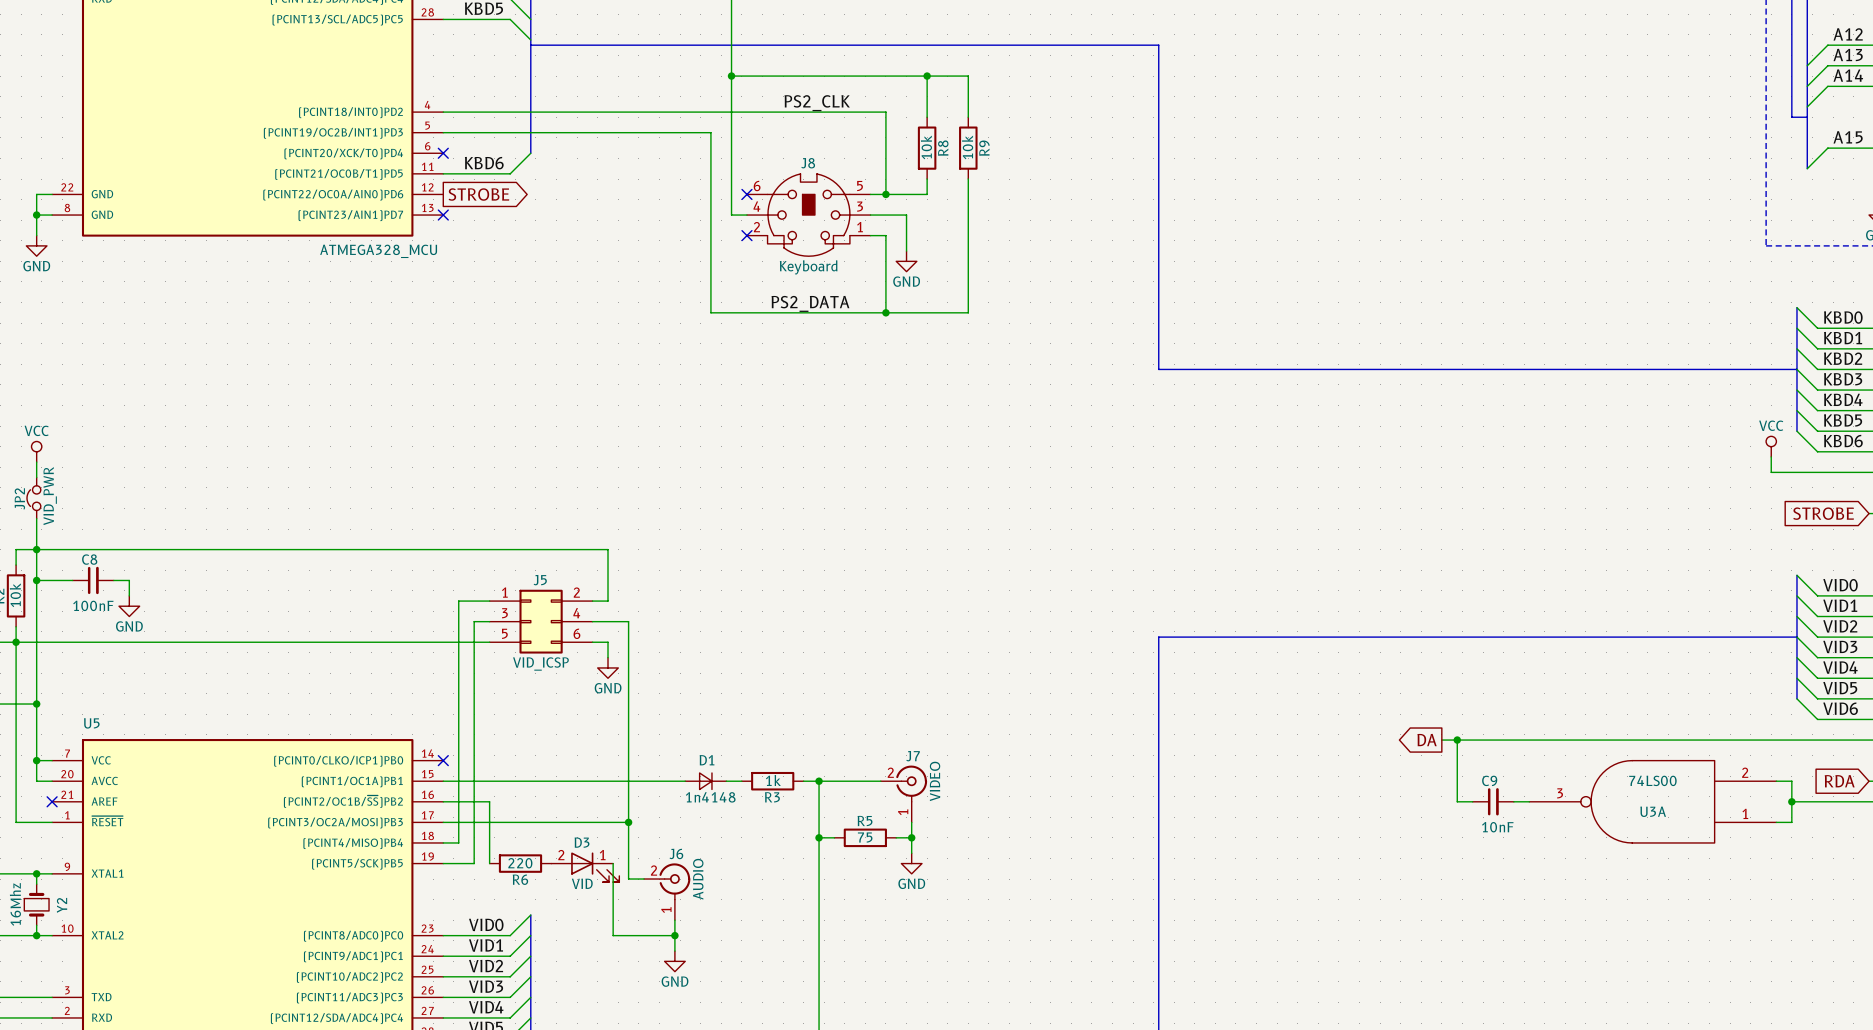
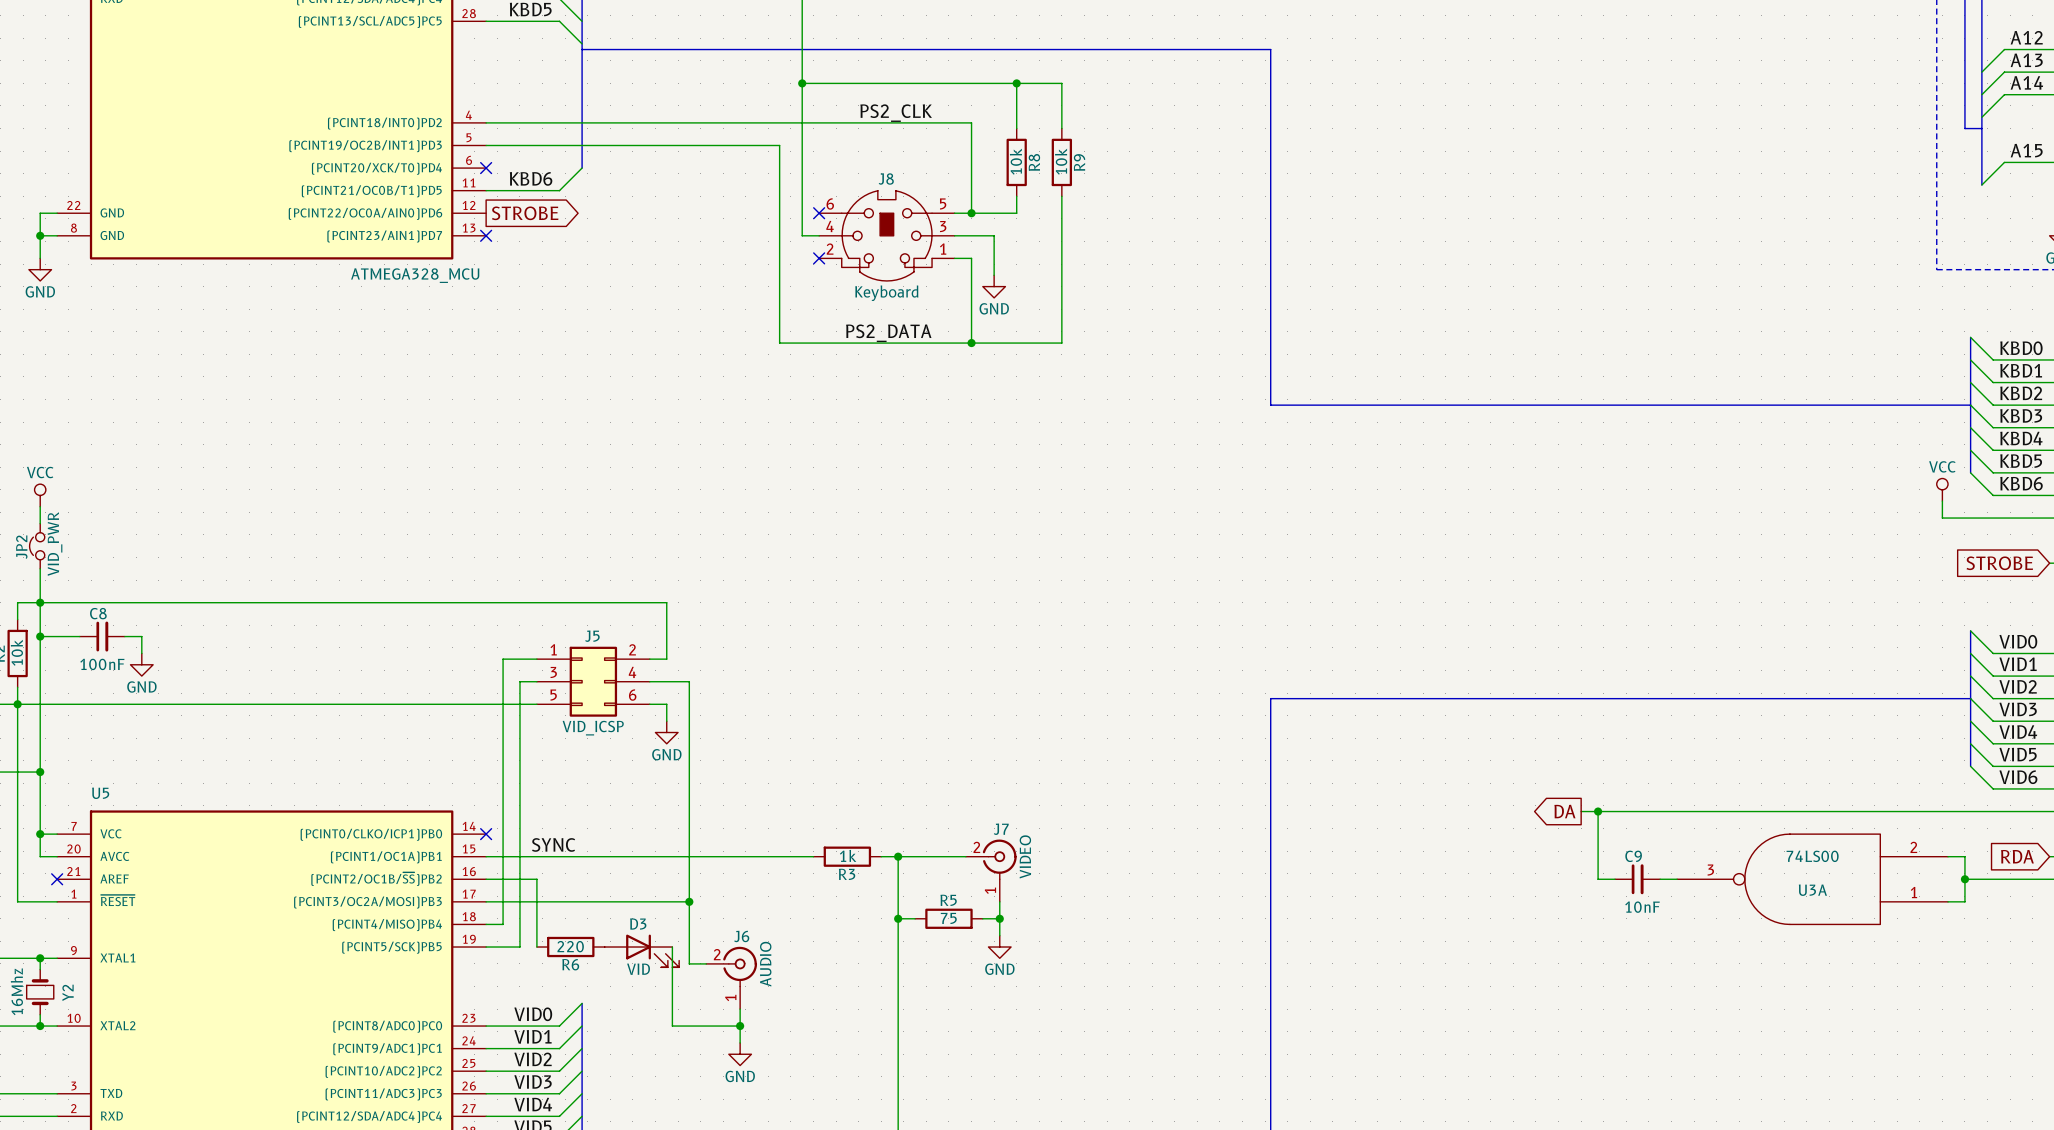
label: none -> SYNC (553, 844)
D1: 1n4148 (705, 781) -> none
D3 symbol: [551, 852, 620, 883] -> [604, 934, 680, 968]

